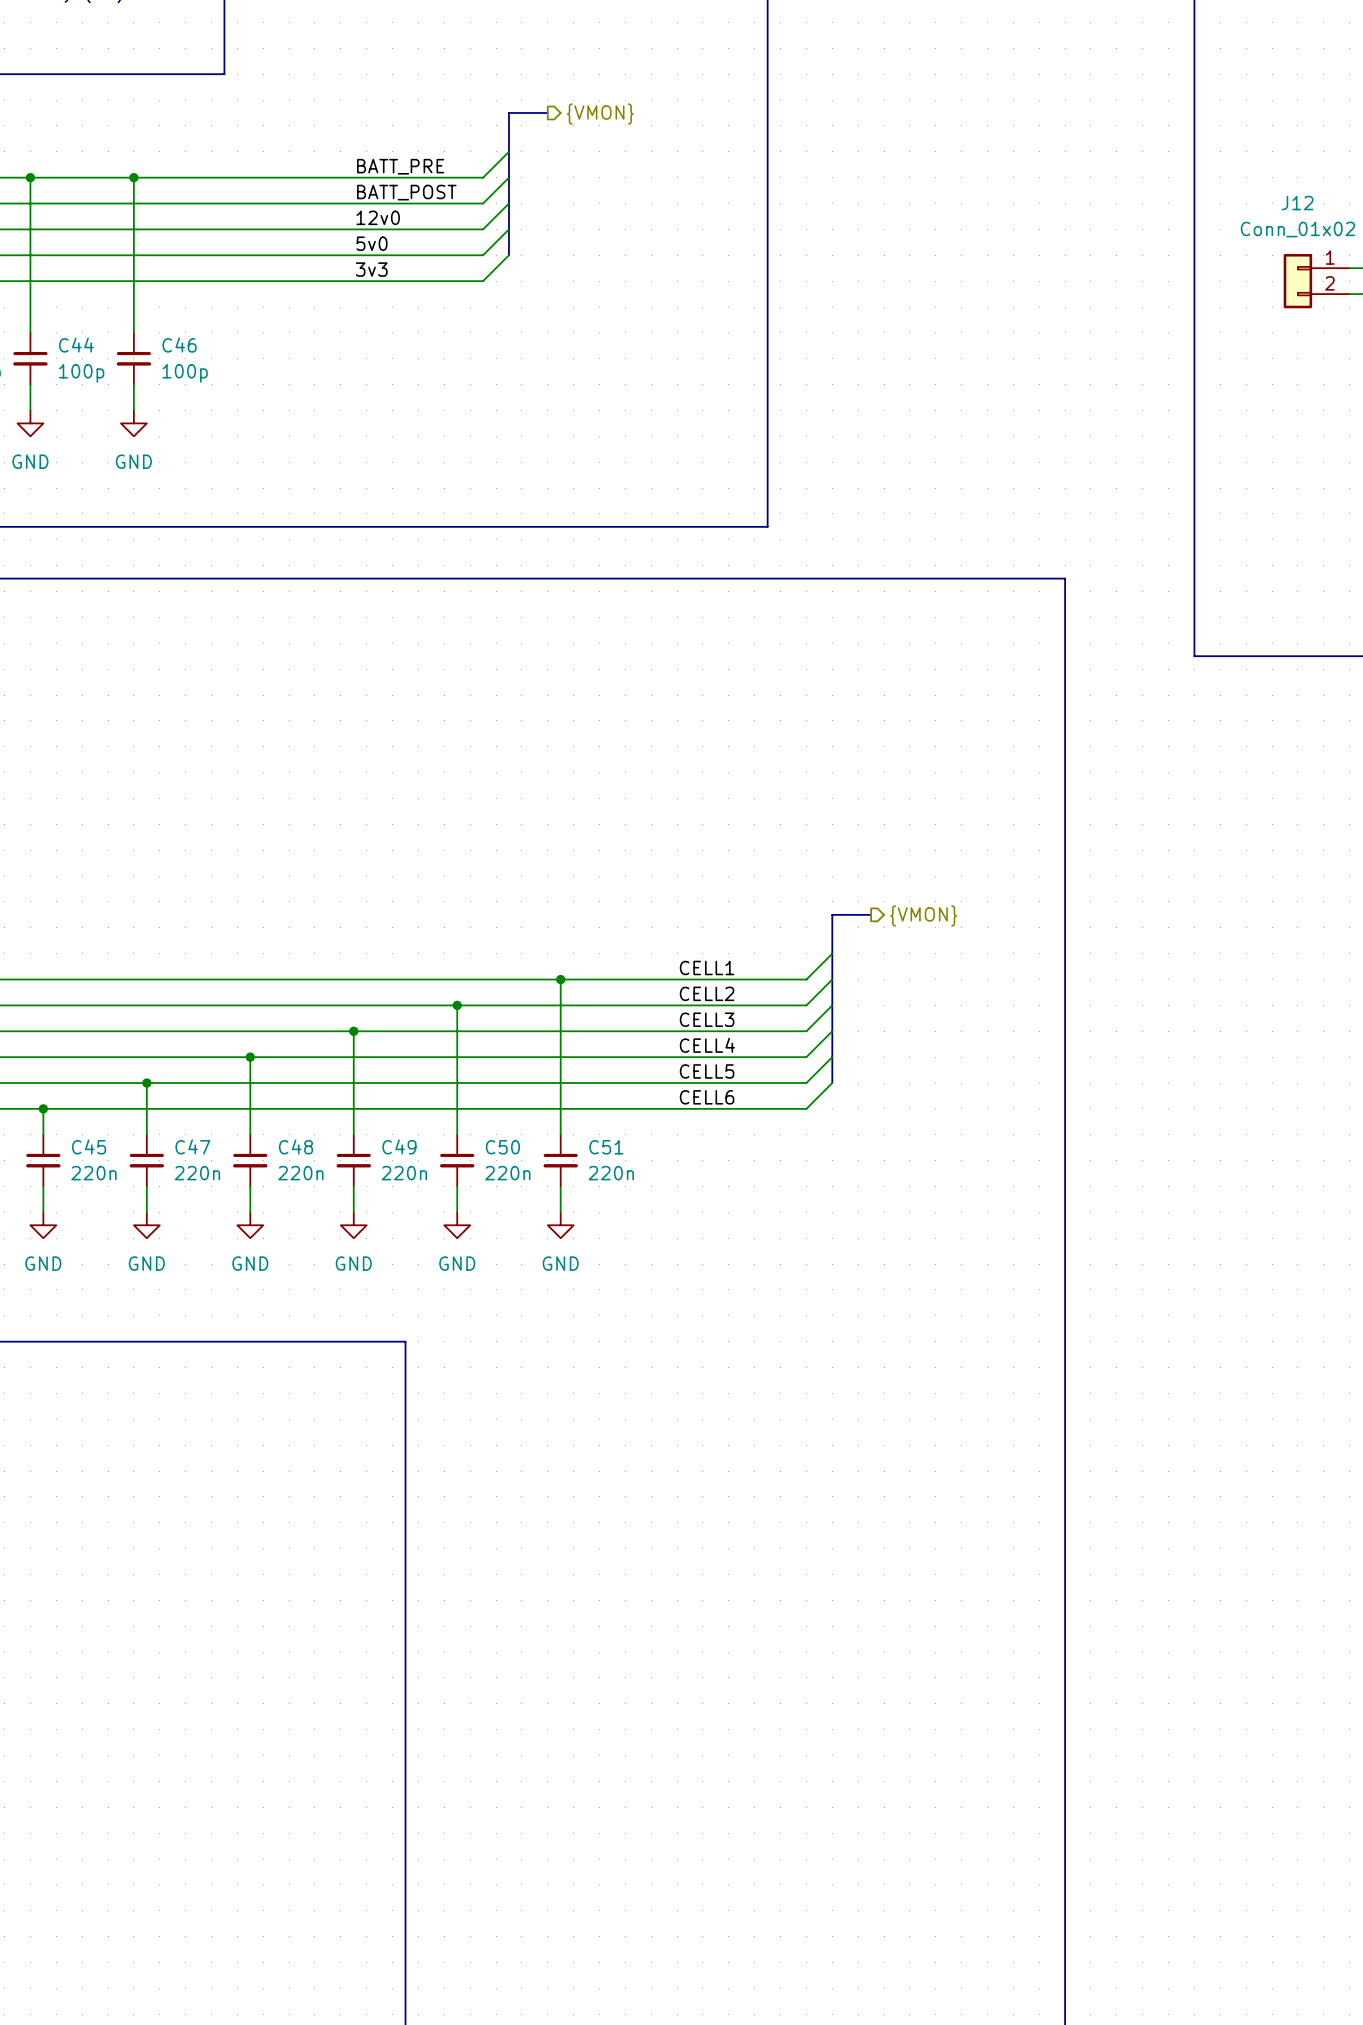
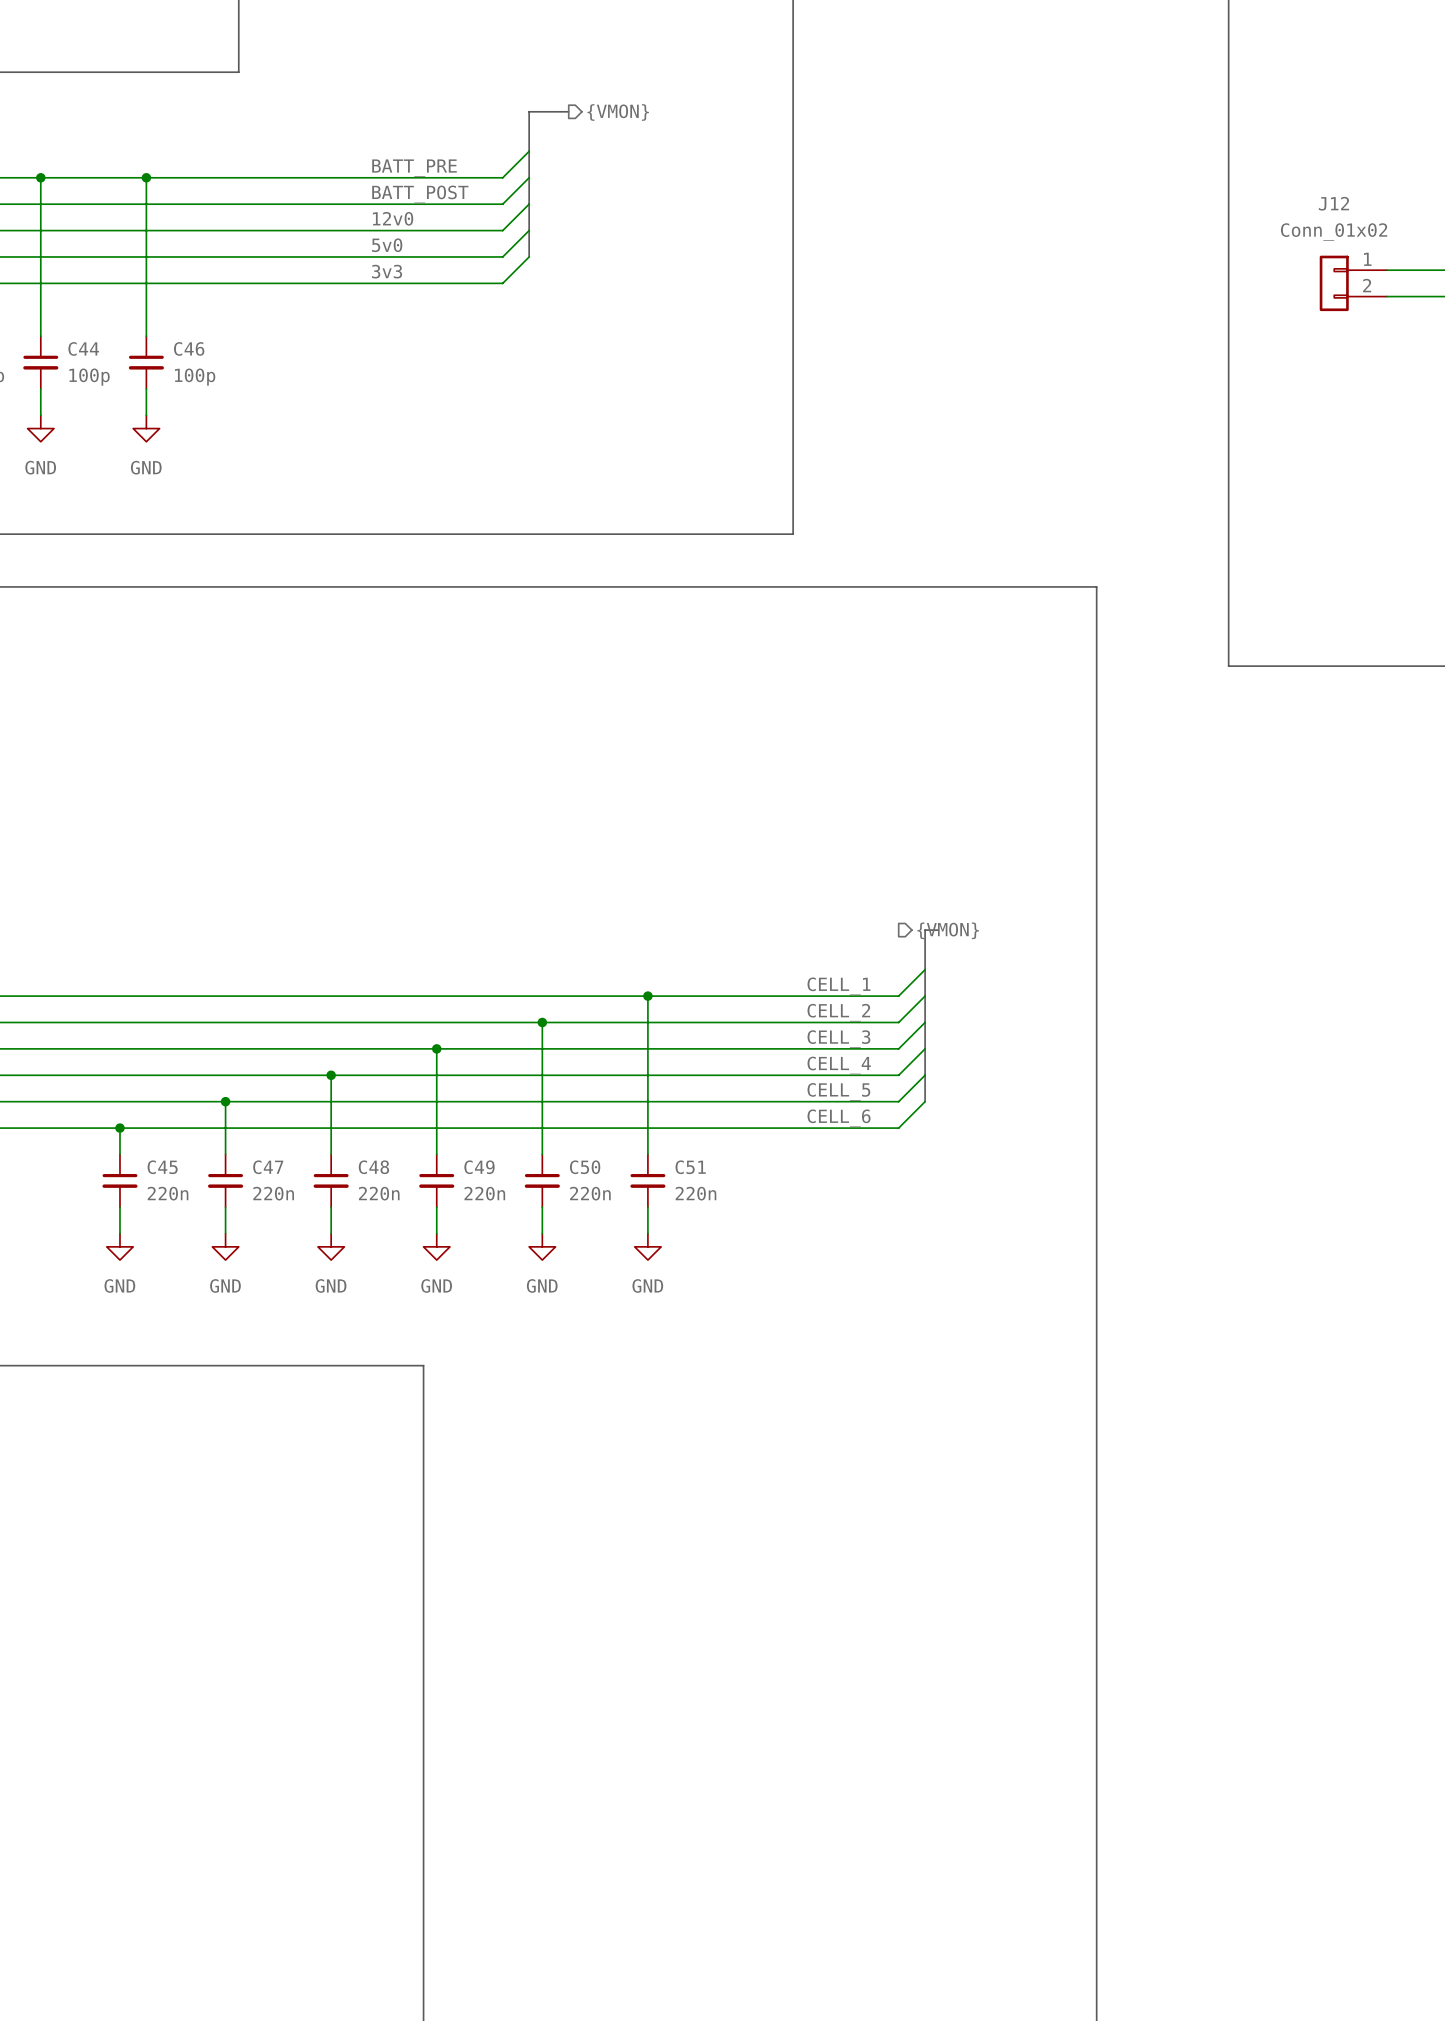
bus: (871, 914) (832, 914) (832, 1083) -> none
bus: none -> (938, 930) (925, 930) (925, 1101)
wire: (832, 953) (806, 979) -> (925, 969) (898, 996) (832, 996)
label: CELL1 (707, 968) -> none
label: none -> CELL_1 (839, 986)
wire: (560, 979) (560, 1134) -> (647, 996) (647, 1154)
junction: (560, 979) -> none
junction: none -> (647, 996)
wire: (832, 979) (806, 1005) -> (925, 996) (898, 1022) (832, 1022)
label: CELL2 (707, 993) -> none
label: none -> CELL_2 (838, 1012)
wire: (457, 1005) (457, 1134) -> (542, 1022) (542, 1154)
junction: (457, 1005) -> none
junction: none -> (542, 1022)
wire: (832, 1005) (806, 1031) -> (925, 1022) (898, 1048) (832, 1048)
label: CELL3 (707, 1019) -> none
label: none -> CELL_3 (838, 1039)
wire: (353, 1031) (353, 1134) -> (436, 1048) (436, 1154)
junction: (353, 1031) -> none
junction: none -> (436, 1048)
wire: (832, 1031) (806, 1057) -> (925, 1048) (898, 1075) (832, 1075)
label: CELL4 (707, 1045) -> none
label: none -> CELL_4 (839, 1065)
wire: (250, 1057) (250, 1134) -> (331, 1075) (331, 1154)
junction: (250, 1057) -> none
junction: none -> (331, 1075)
wire: (832, 1057) (806, 1083) -> (925, 1075) (898, 1101) (832, 1101)
label: CELL5 (707, 1071) -> none
label: none -> CELL_5 (838, 1091)
wire: (146, 1083) (146, 1134) -> (225, 1101) (225, 1154)
junction: (146, 1083) -> none
junction: none -> (225, 1101)
wire: (832, 1083) (806, 1108) -> (925, 1101) (898, 1128) (832, 1128)
label: CELL6 (707, 1097) -> none
label: none -> CELL_6 (839, 1118)
wire: (43, 1108) (43, 1134) -> (119, 1128) (119, 1154)
junction: (43, 1108) -> none
junction: none -> (119, 1128)
C45 position: (43, 1160) -> (119, 1180)
C47 position: (146, 1160) -> (225, 1180)
C48 position: (250, 1160) -> (331, 1180)
C49 position: (353, 1160) -> (436, 1180)
C50 position: (457, 1160) -> (542, 1180)
C51 position: (560, 1160) -> (647, 1180)
wire: (43, 1186) (43, 1212) -> (119, 1207) (119, 1233)
wire: (146, 1186) (146, 1212) -> (225, 1207) (225, 1233)
wire: (250, 1186) (250, 1212) -> (331, 1207) (331, 1233)
wire: (353, 1186) (353, 1212) -> (436, 1207) (436, 1233)
wire: (457, 1186) (457, 1212) -> (542, 1207) (542, 1233)
wire: (560, 1186) (560, 1212) -> (647, 1207) (647, 1233)
power symbol: GND (43, 1225) -> none
power symbol: none -> GND (119, 1246)
power symbol: GND (146, 1225) -> none
power symbol: none -> GND (225, 1246)
power symbol: GND (250, 1225) -> none
power symbol: none -> GND (331, 1246)
power symbol: GND (353, 1225) -> none
power symbol: none -> GND (436, 1246)
power symbol: GND (457, 1225) -> none
power symbol: none -> GND (542, 1246)
power symbol: GND (560, 1225) -> none
power symbol: none -> GND (647, 1246)

